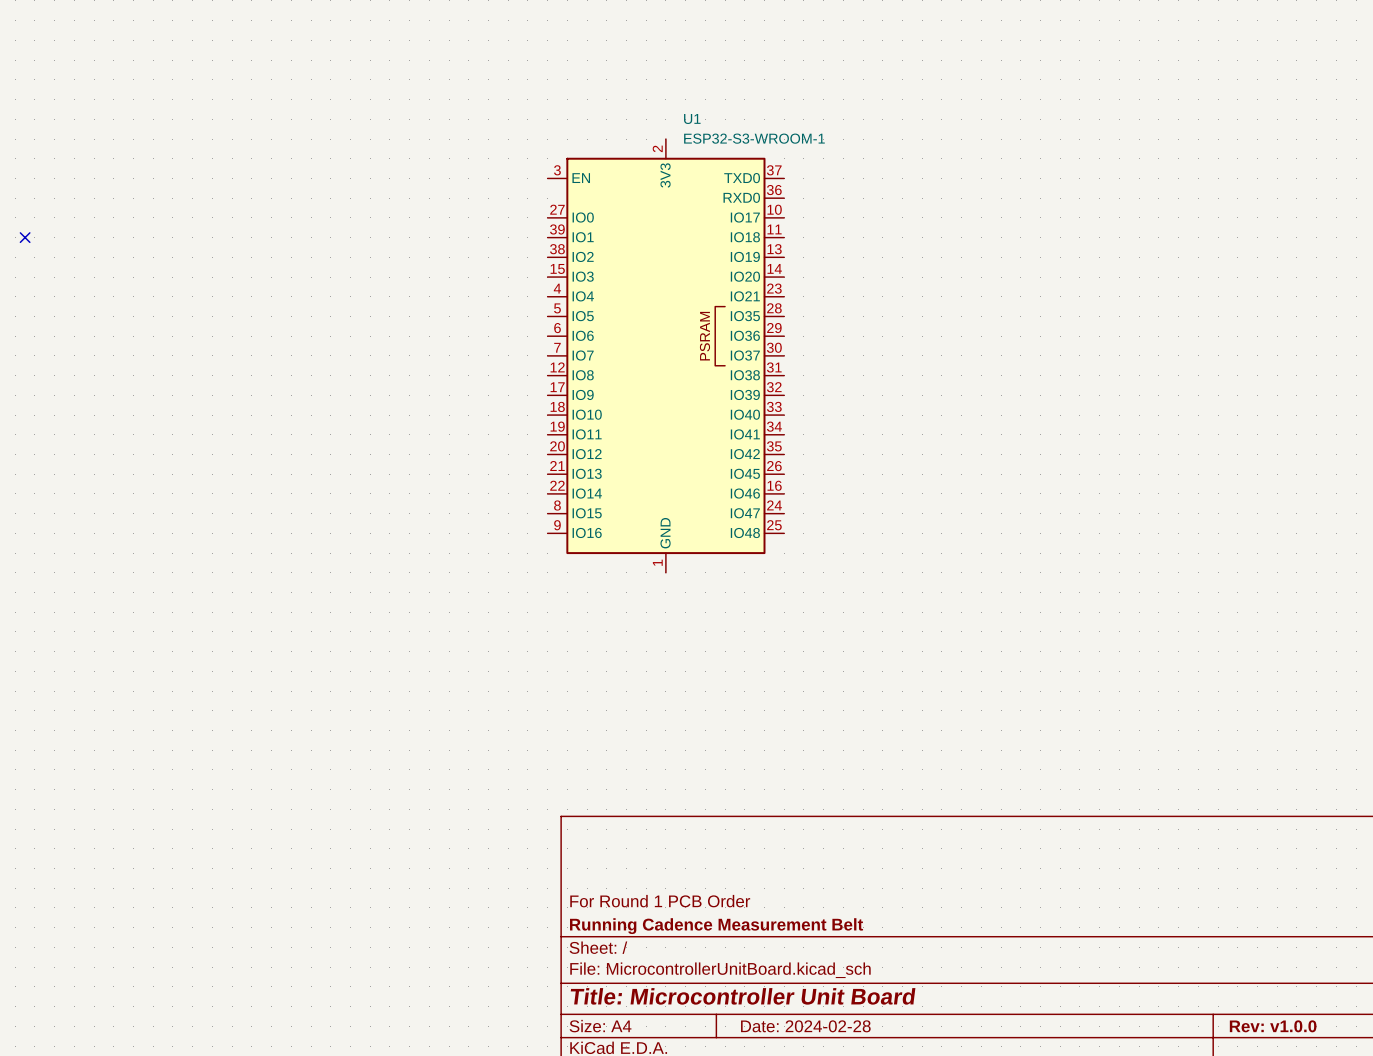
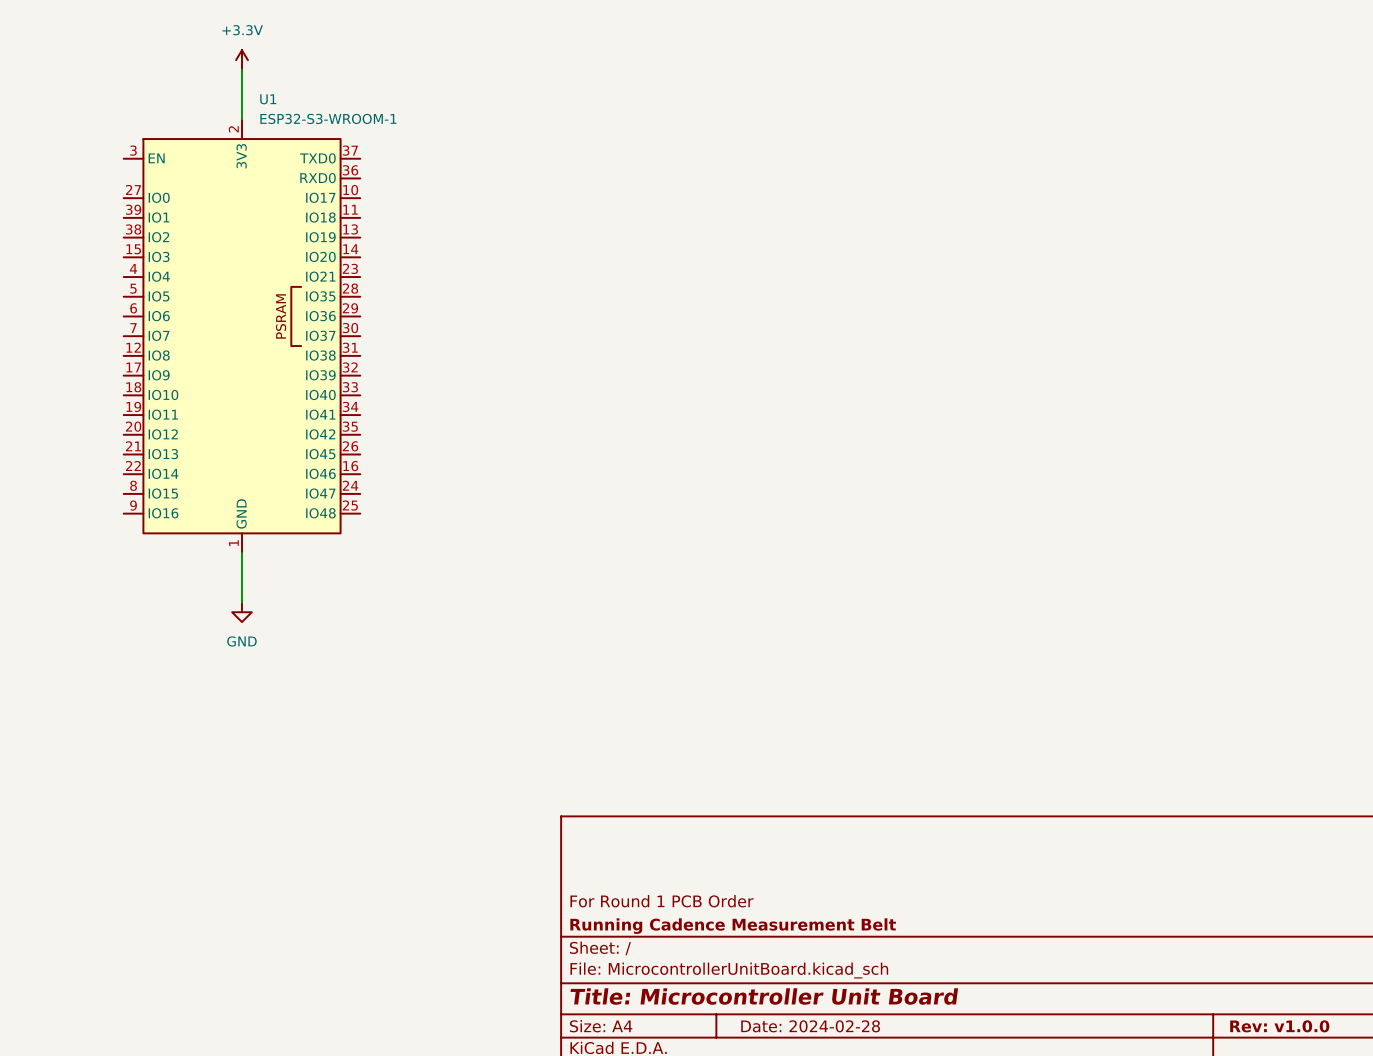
power symbol: none -> +3.3V (241, 60)
wire: none -> (241, 70) (241, 119)
no-connect mark: (25, 237) -> none
U1 position: (665, 355) -> (241, 336)
wire: none -> (241, 553) (241, 602)
power symbol: none -> GND (241, 612)

